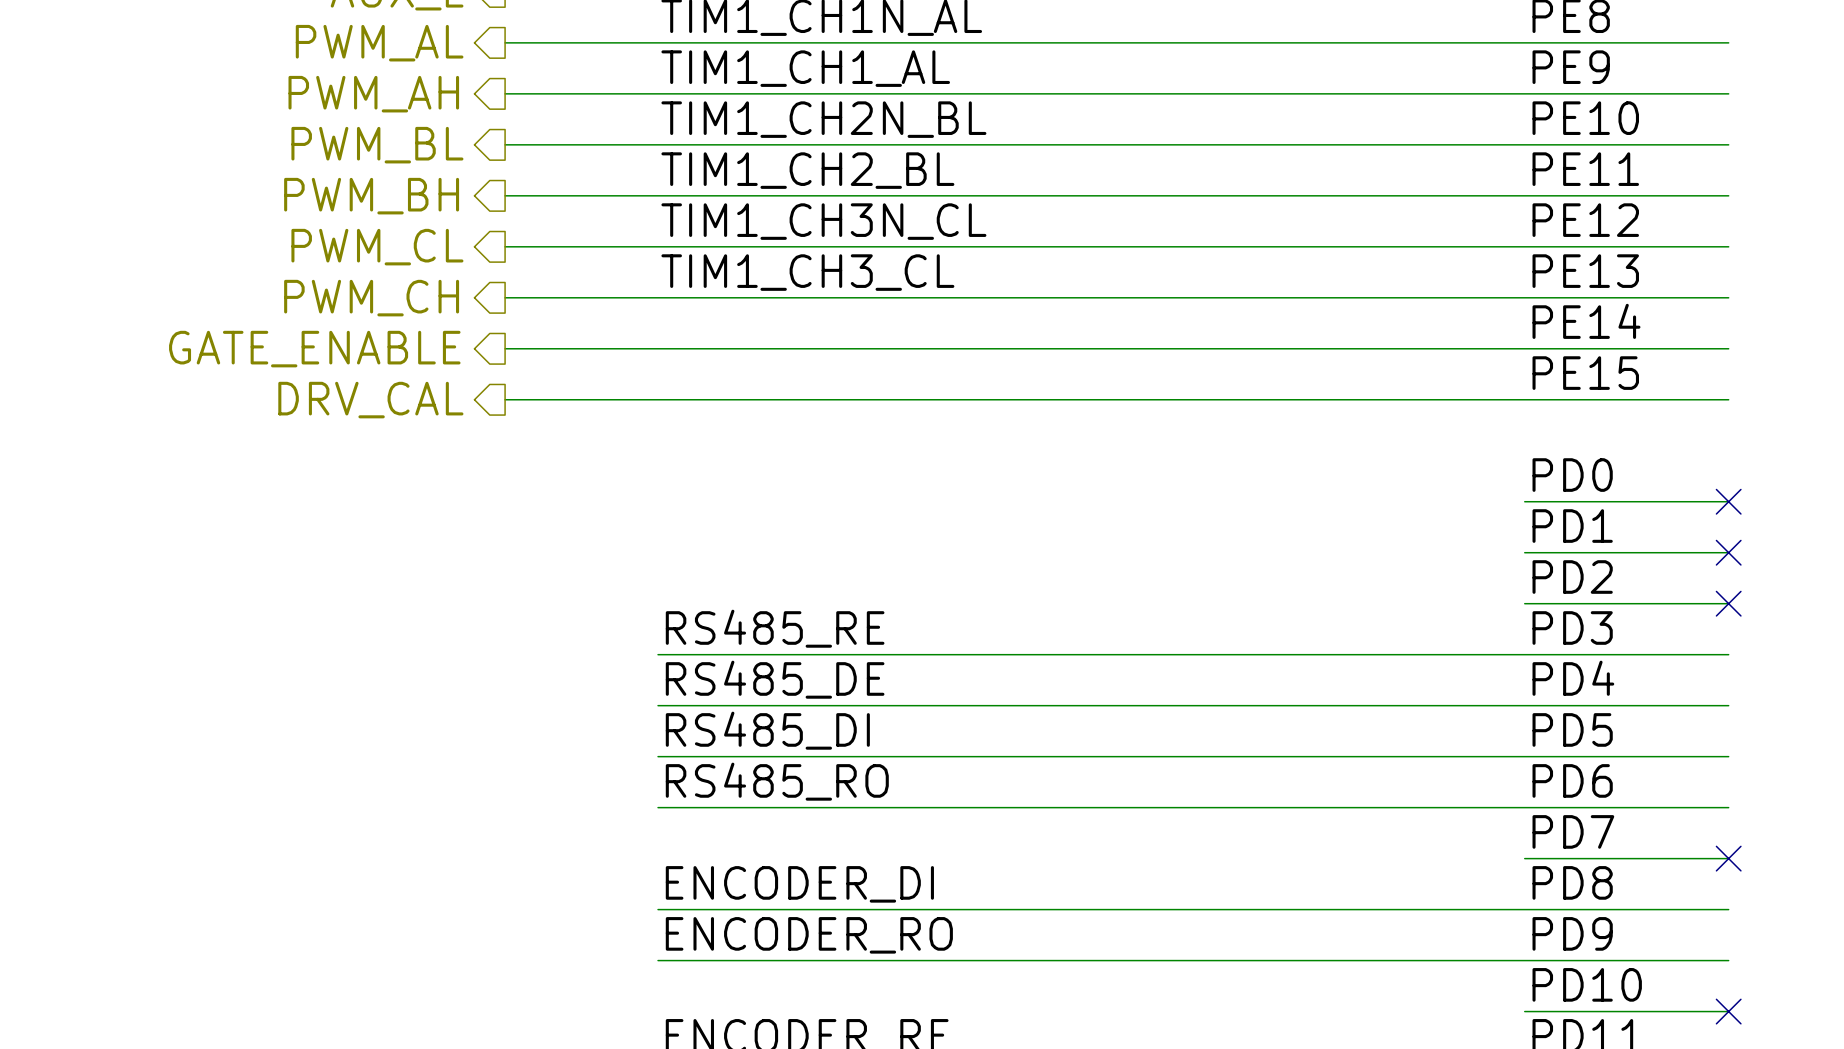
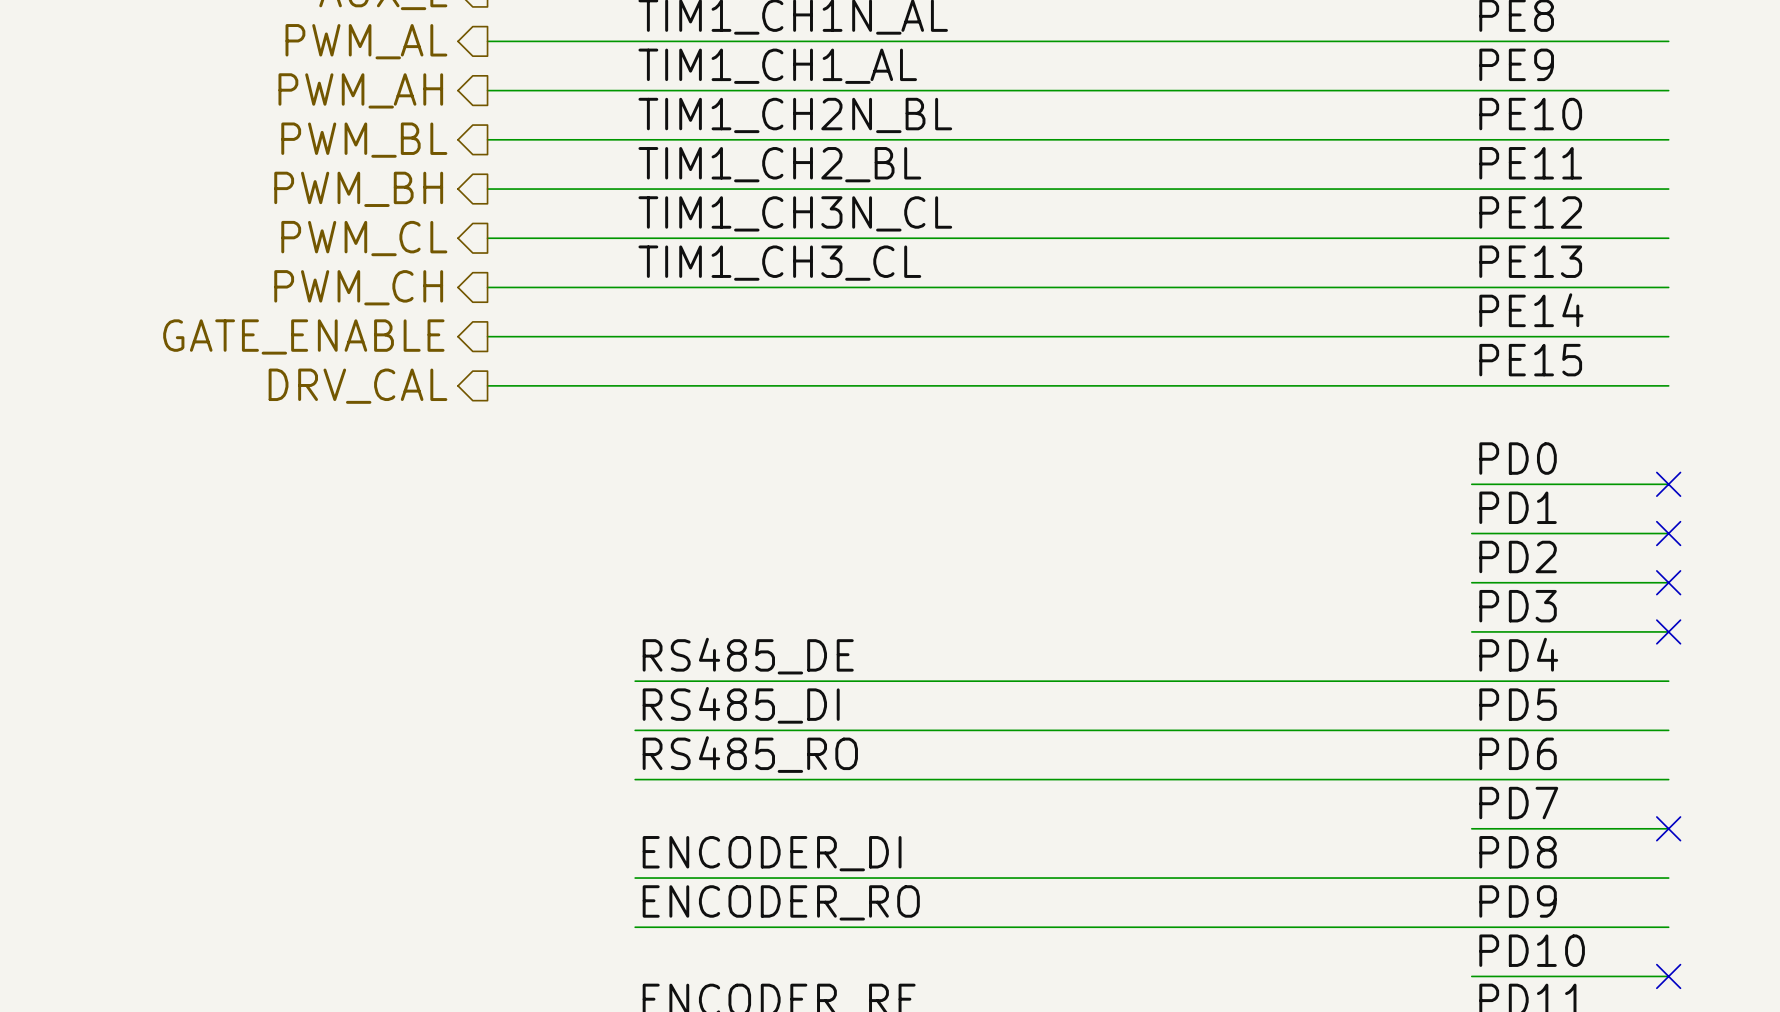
label: RS485_RE (775, 628) -> none
wire: (658, 654) (1524, 654) -> none
no-connect mark: none -> (1668, 631)

